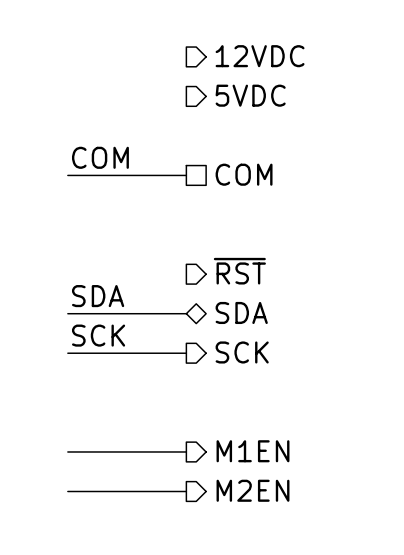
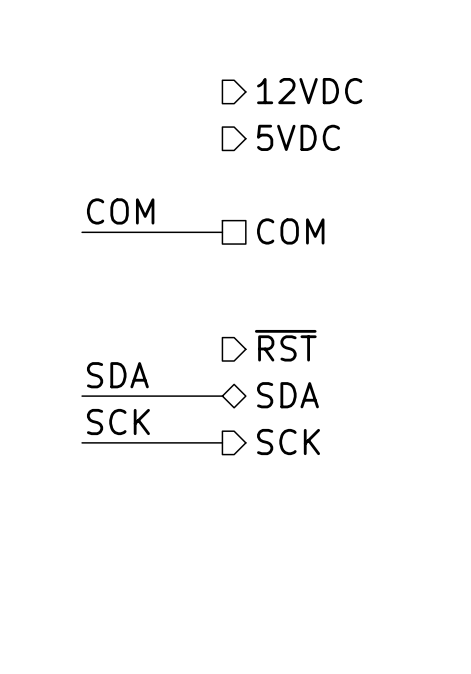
wire: (67, 451) (186, 451) -> none
hierarchical label: M1EN (252, 451) -> none
hierarchical label: M2EN (252, 490) -> none
wire: (67, 491) (186, 491) -> none

